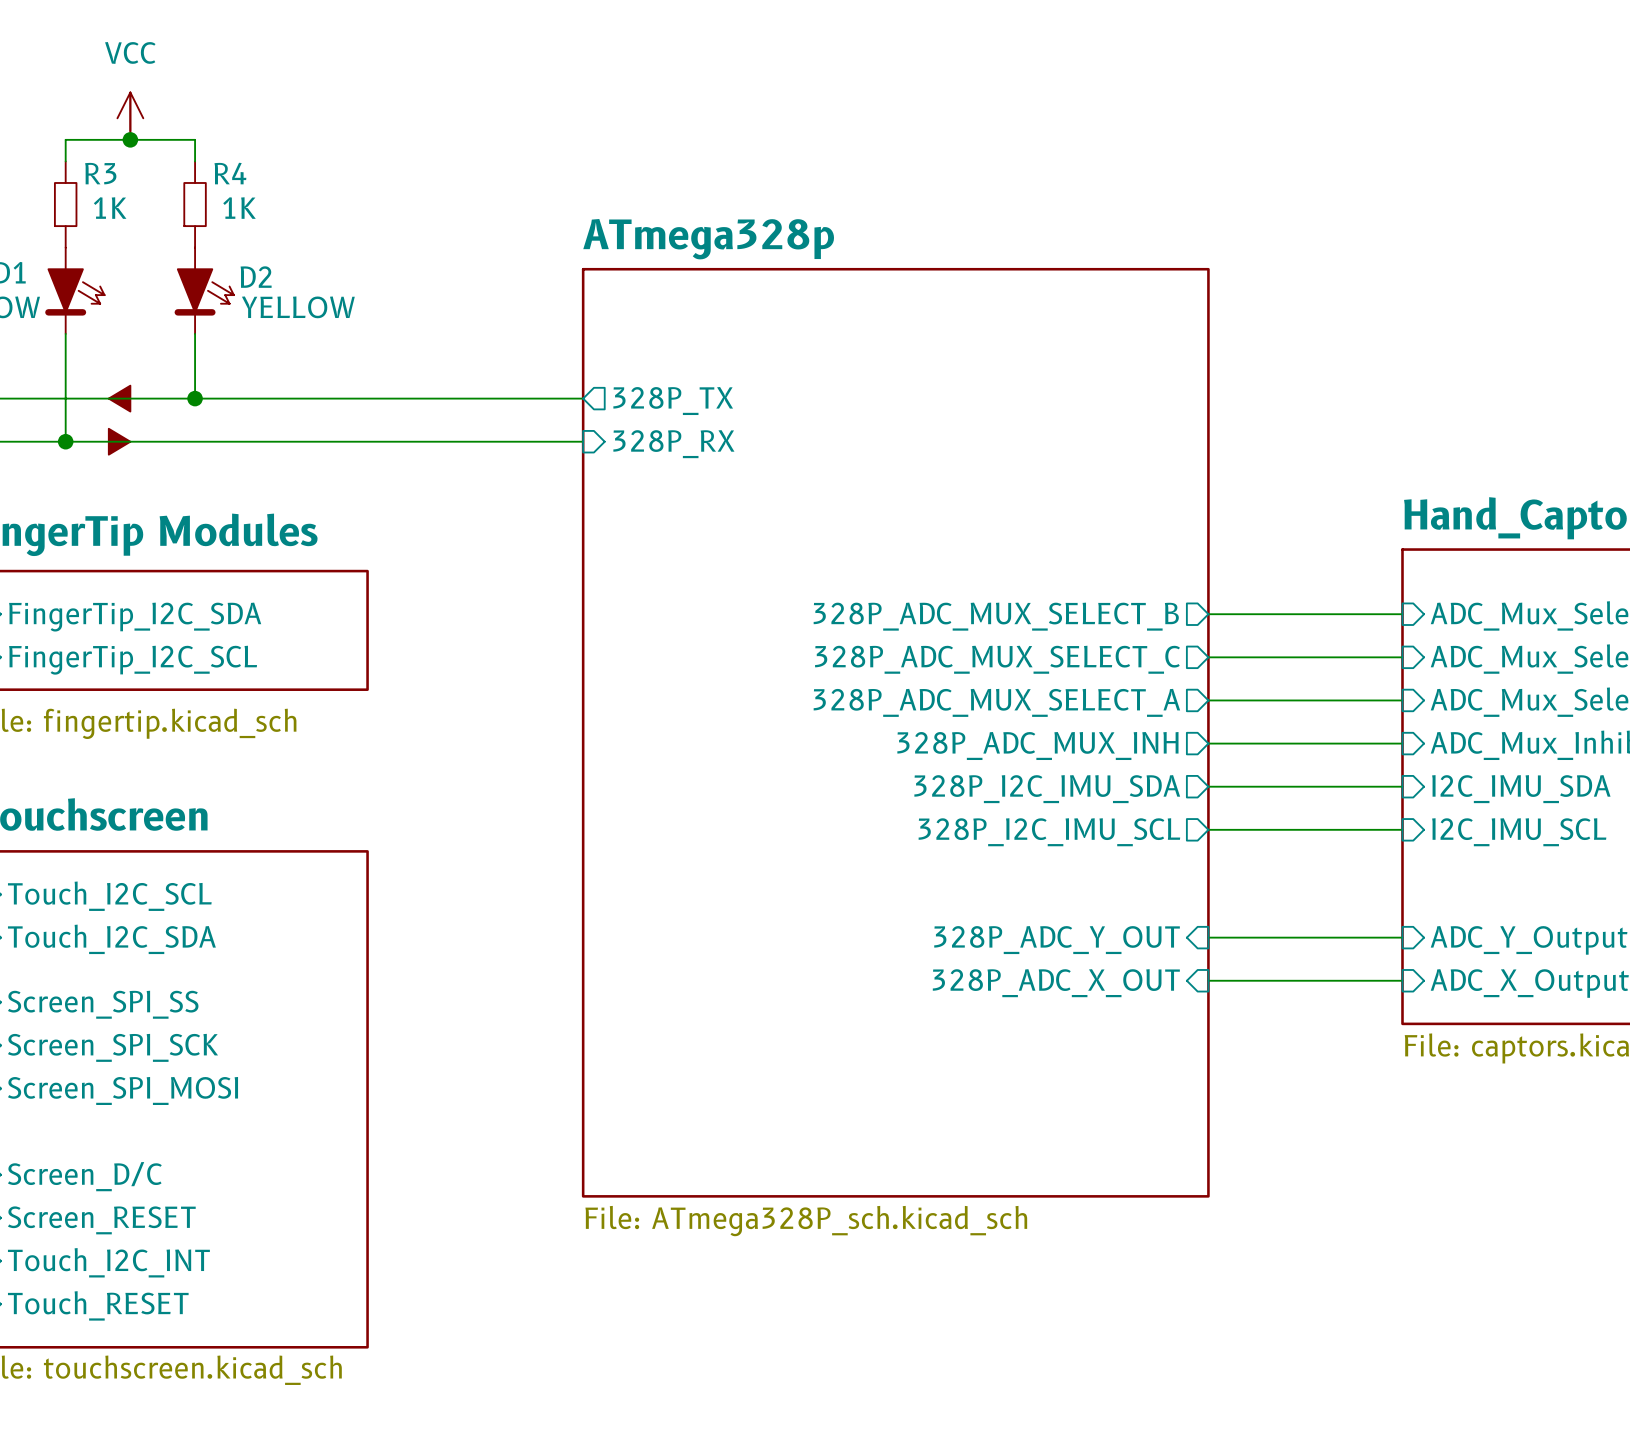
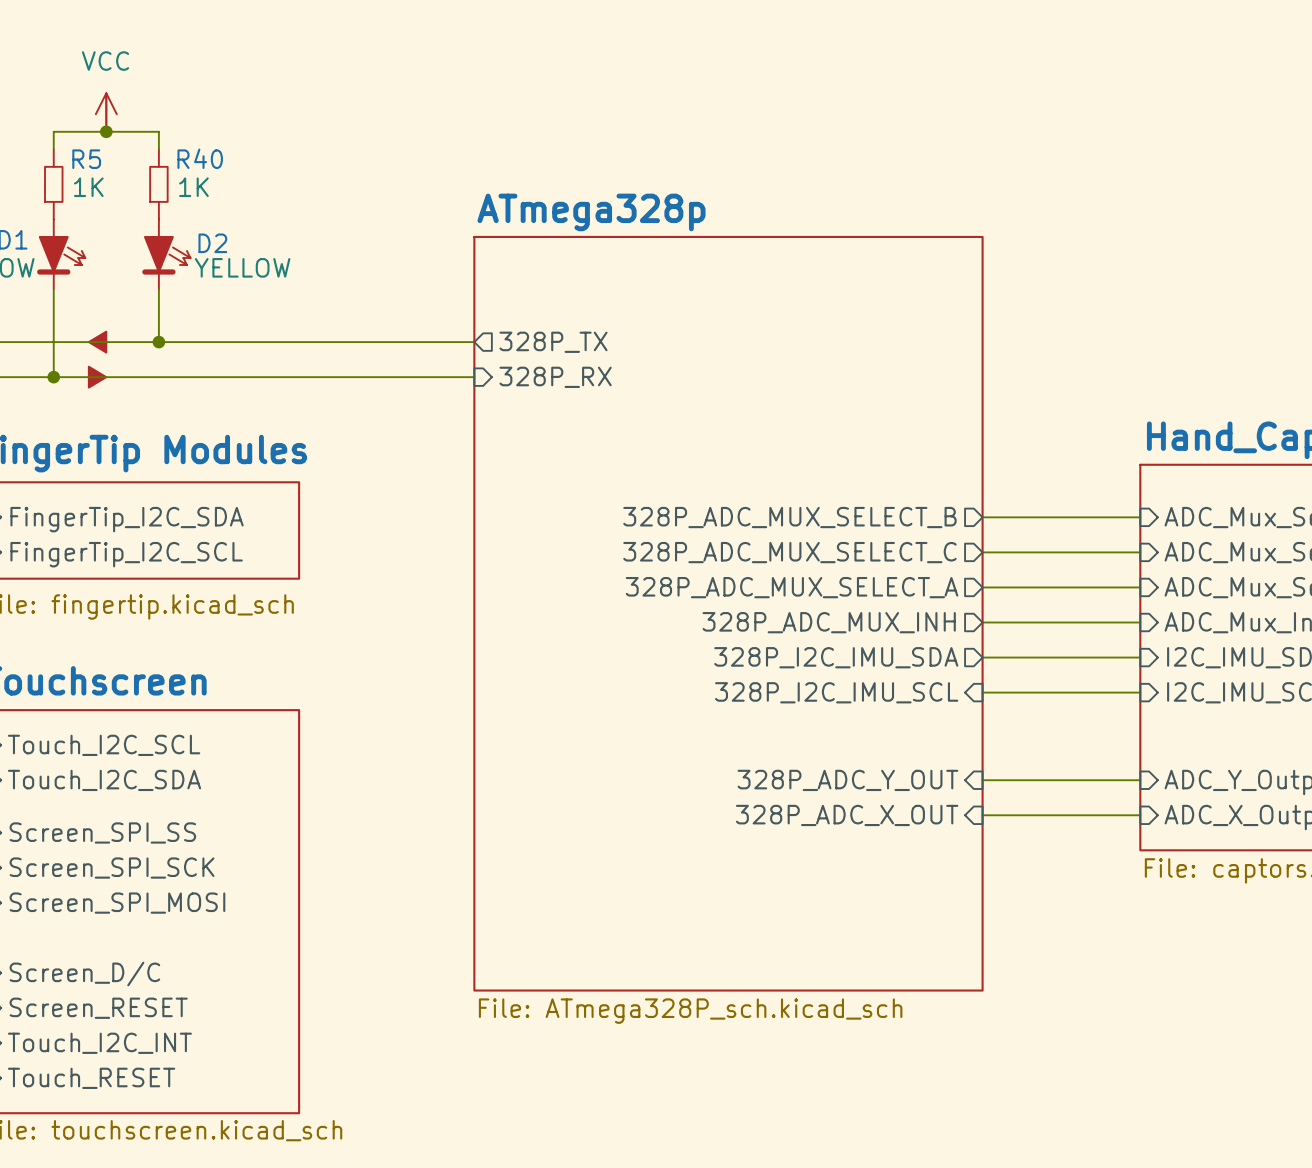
R3 name: R3 (100, 173) -> R5 (86, 159)
R4 name: R4 (230, 173) -> R40 (200, 158)
sheet pin shape: output (1049, 832) -> input (836, 692)

